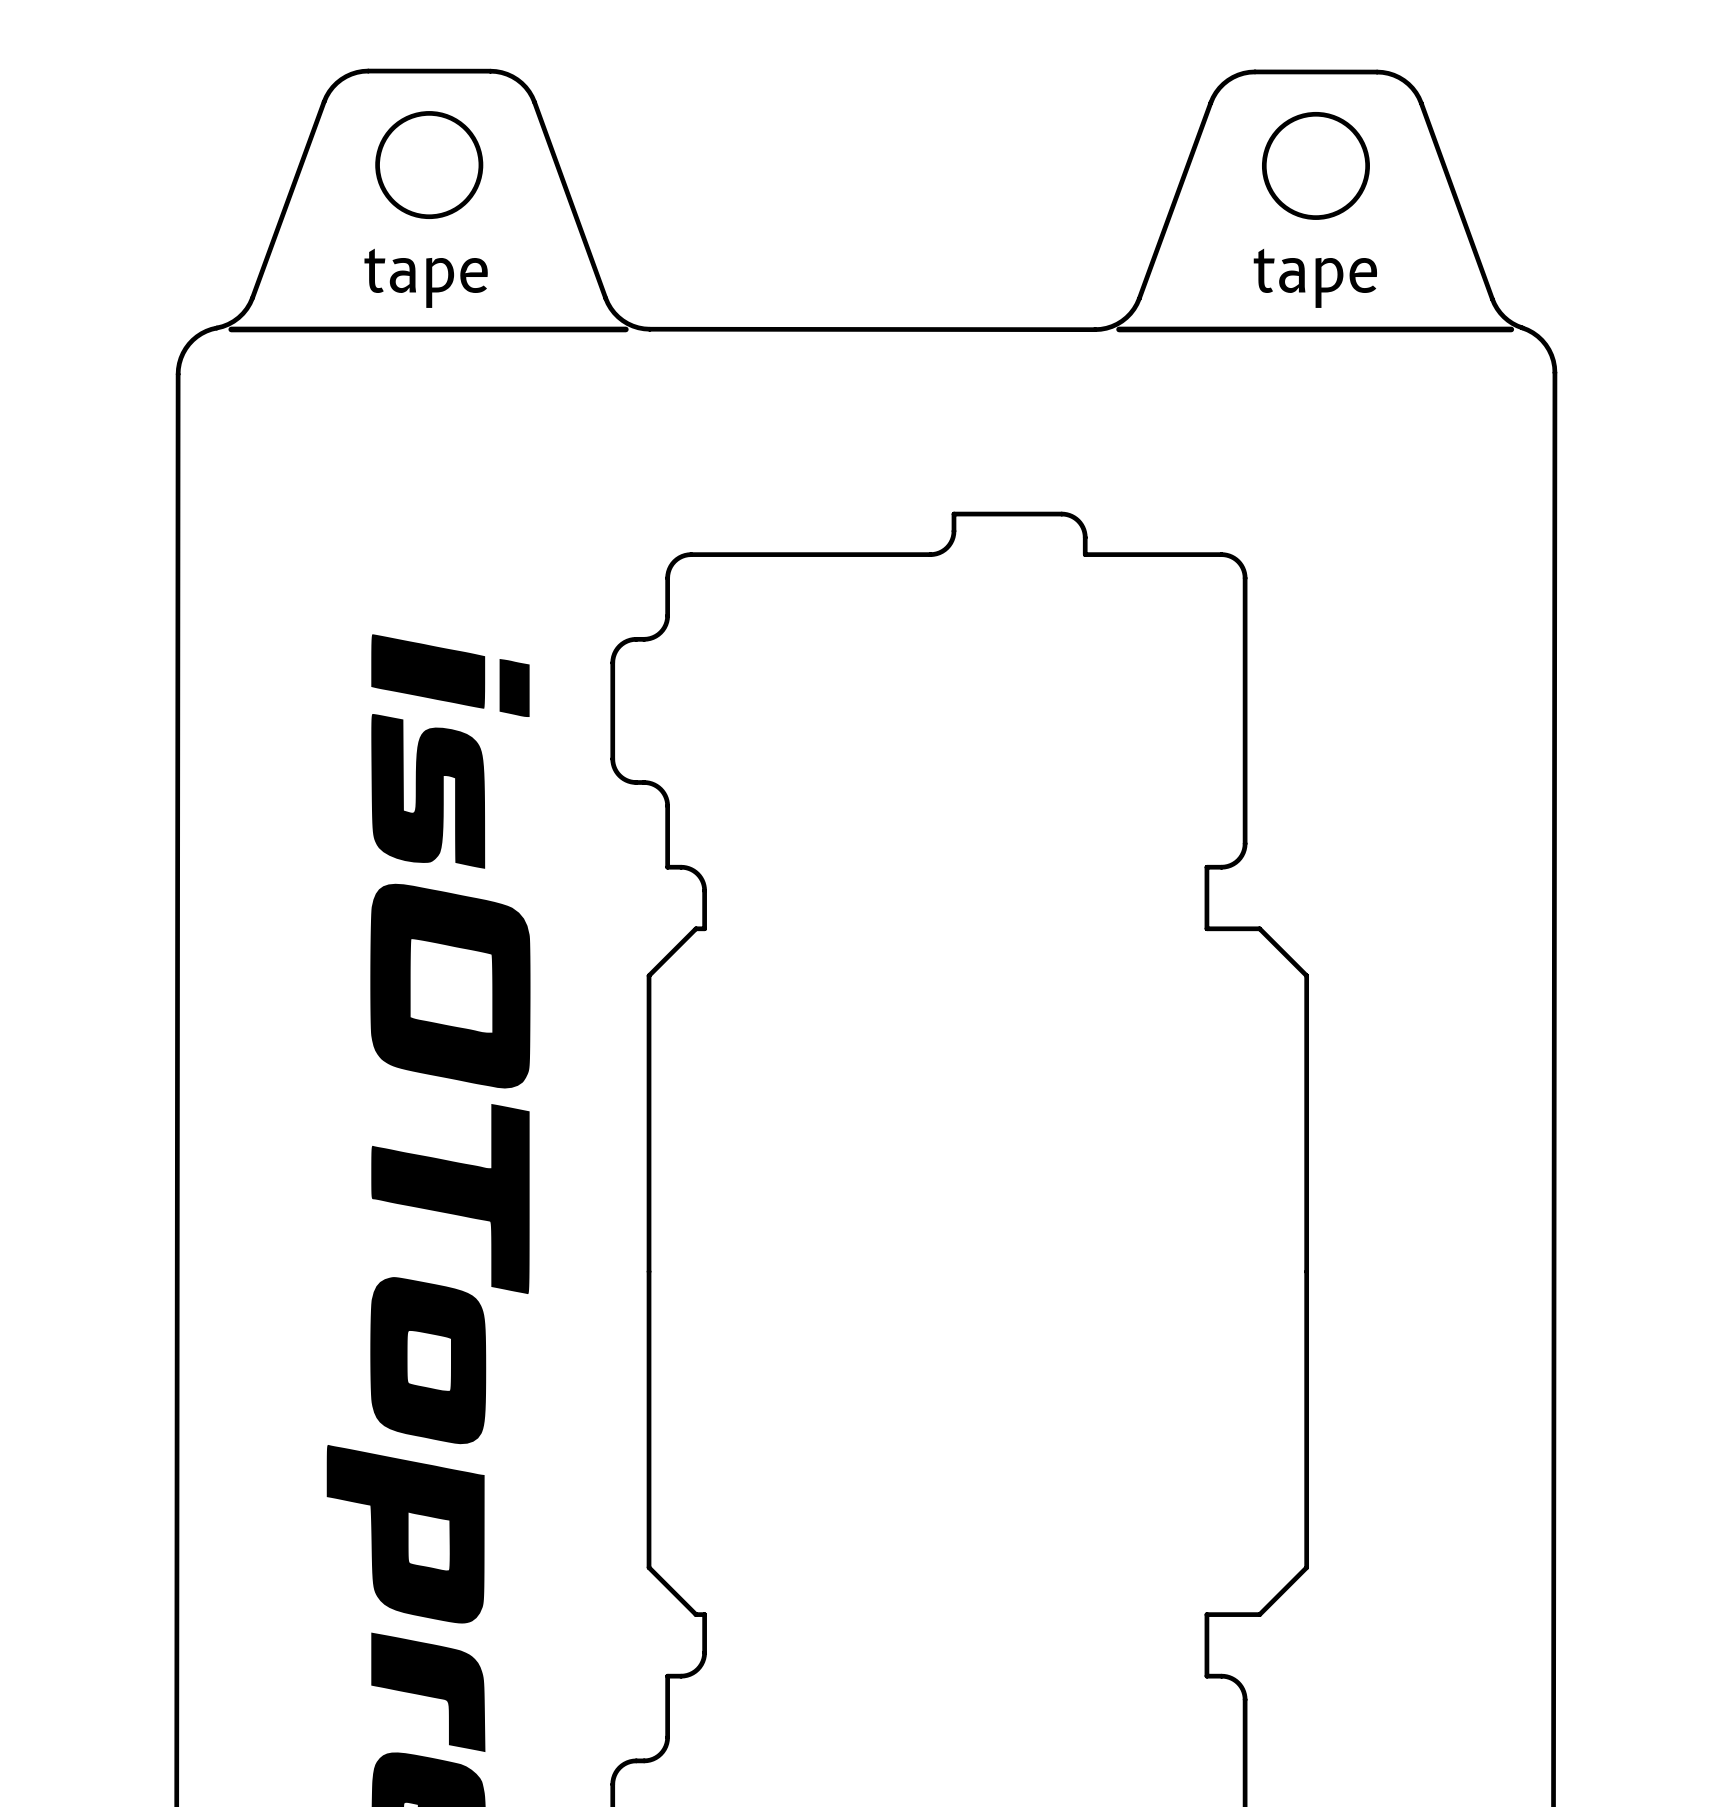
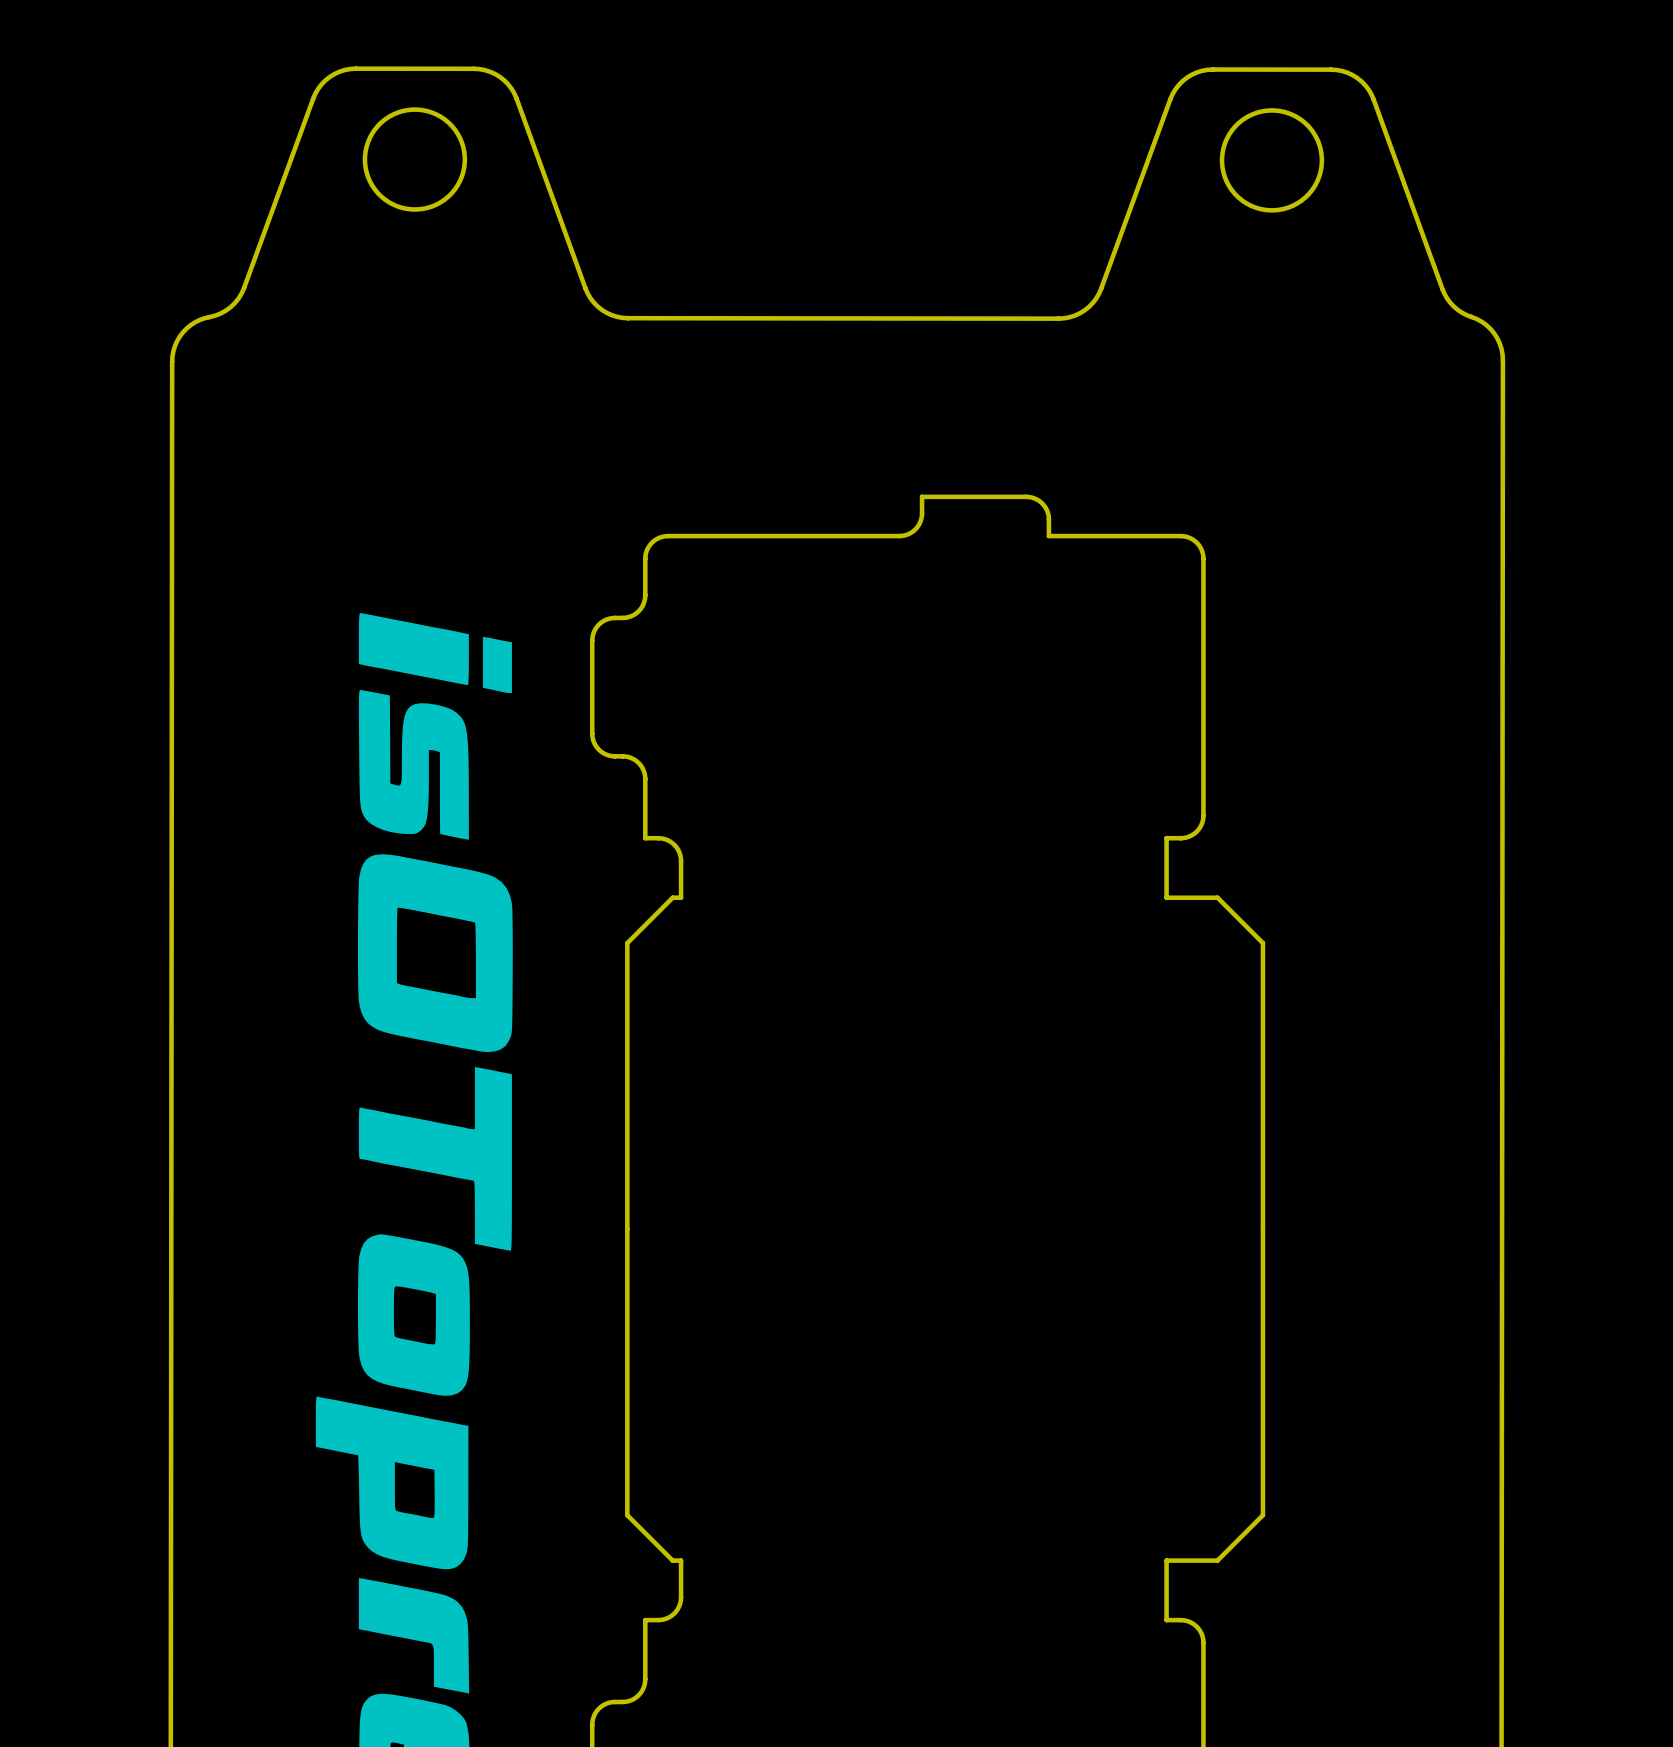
text: tape (426, 278) -> none
text: tape (1315, 278) -> none
line: (231, 329) (625, 329) -> none
line: (1119, 329) (1511, 329) -> none

